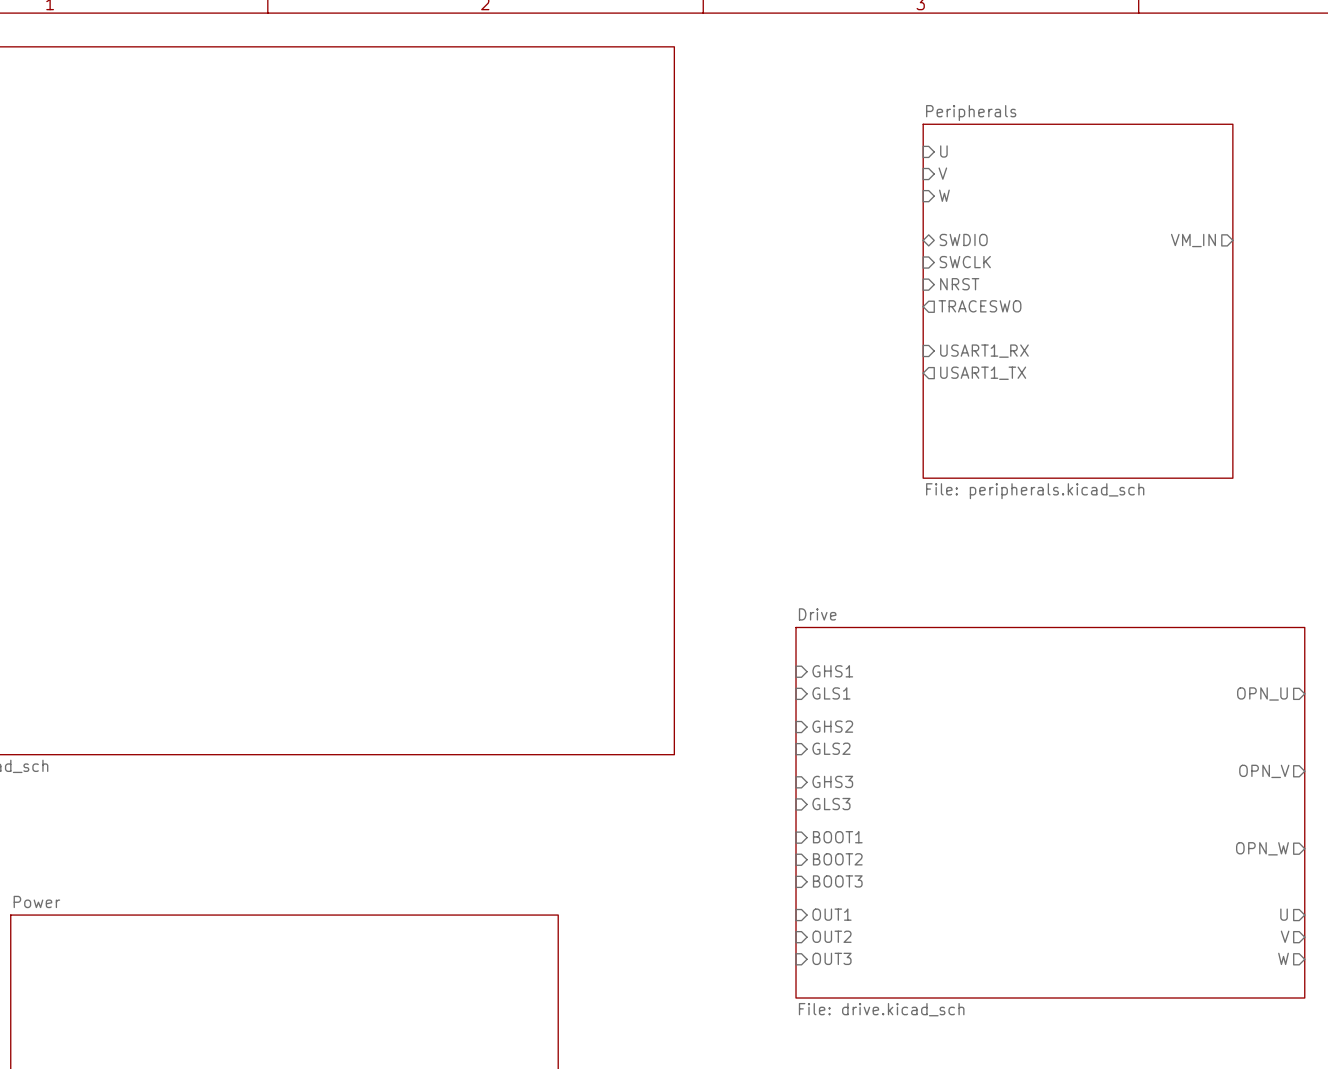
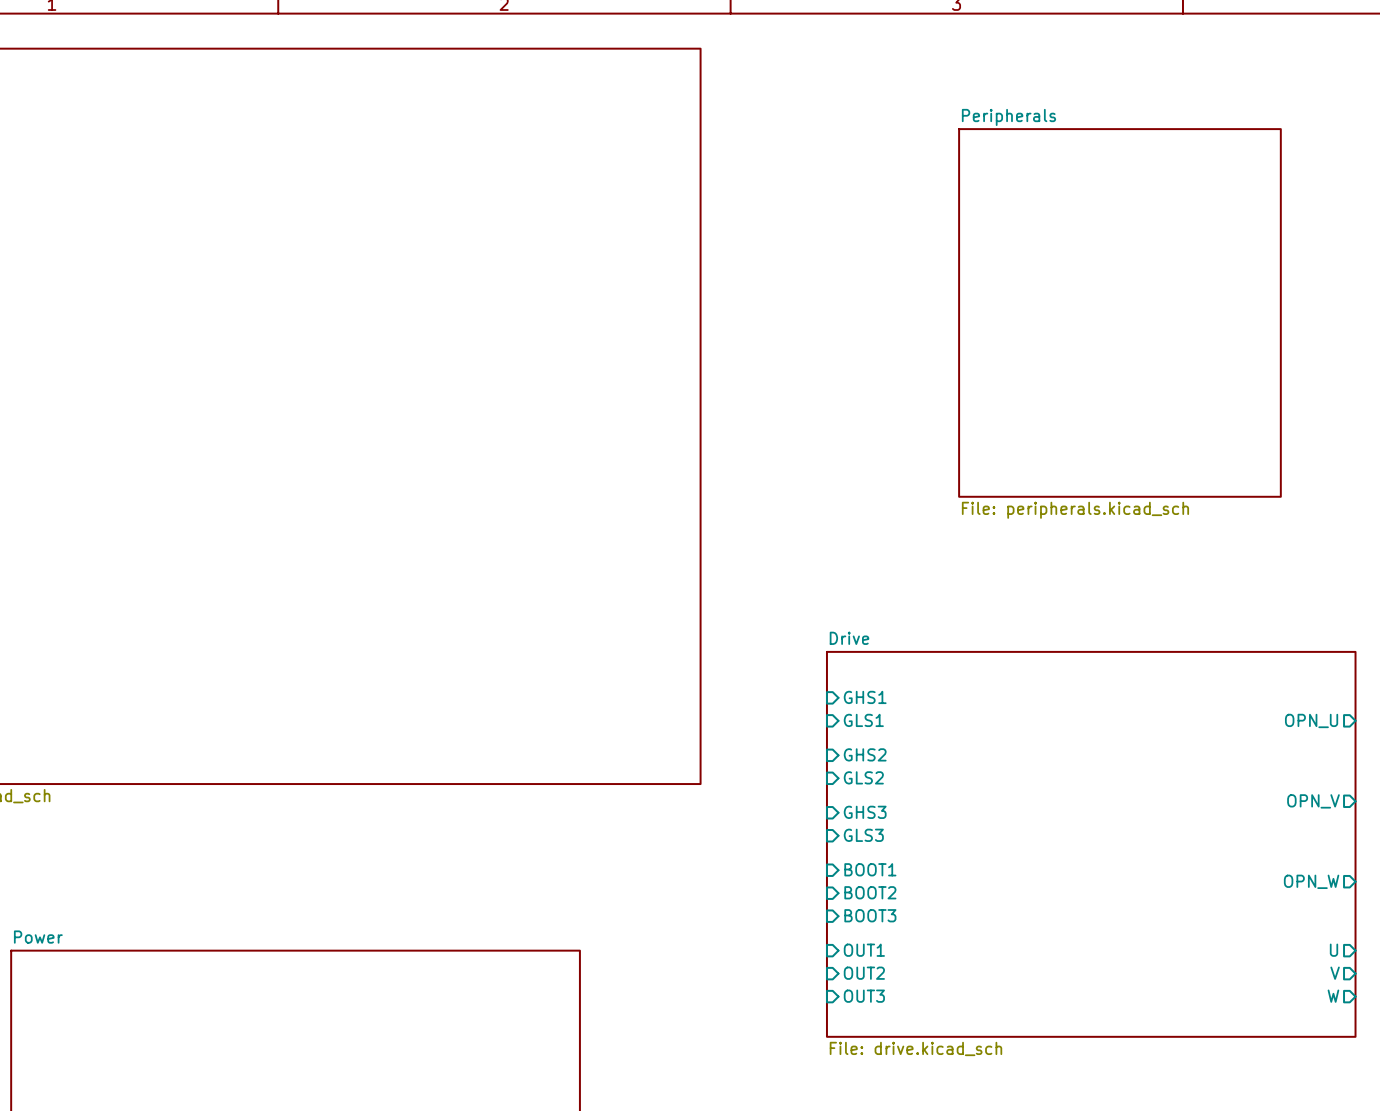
sheet pin: U (943, 151) -> none
sheet pin: V (942, 173) -> none
sheet pin: W (944, 195) -> none
sheet pin: SWDIO (963, 239) -> none
sheet pin: VM_IN (1193, 240) -> none
sheet pin: SWCLK (965, 262) -> none
sheet pin: NRST (959, 284) -> none
sheet pin: TRACESWO (979, 306) -> none
sheet pin: USART1_RX (984, 351) -> none
sheet pin: USART1_TX (983, 373) -> none

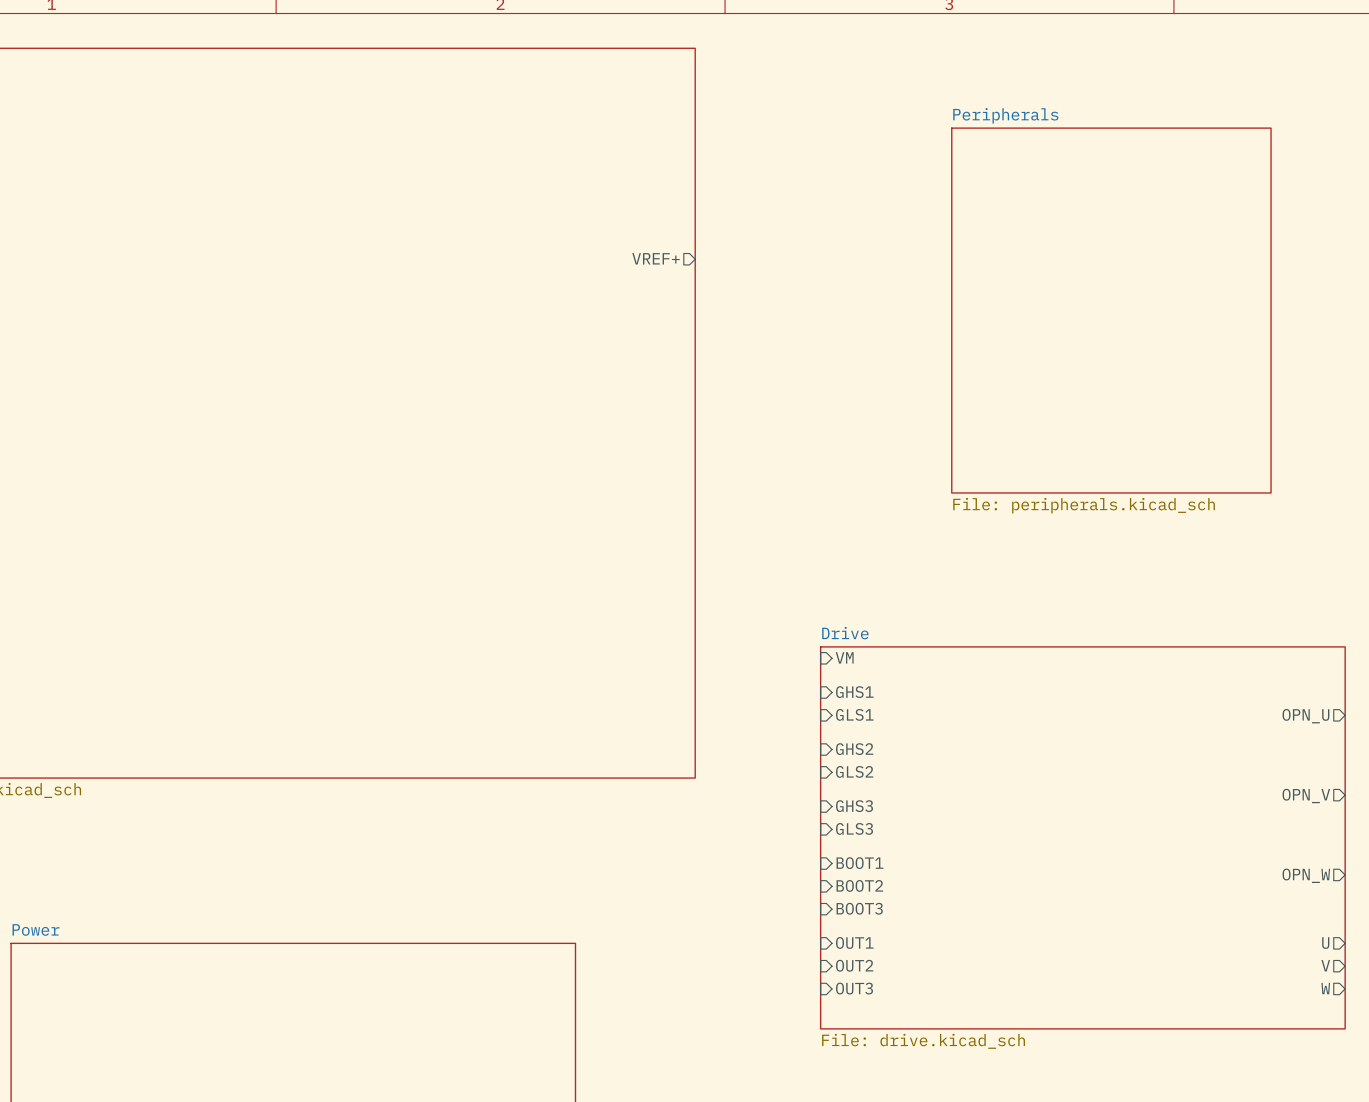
sheet pin: none -> VREF+ (656, 258)
sheet pin: none -> VM (844, 657)

